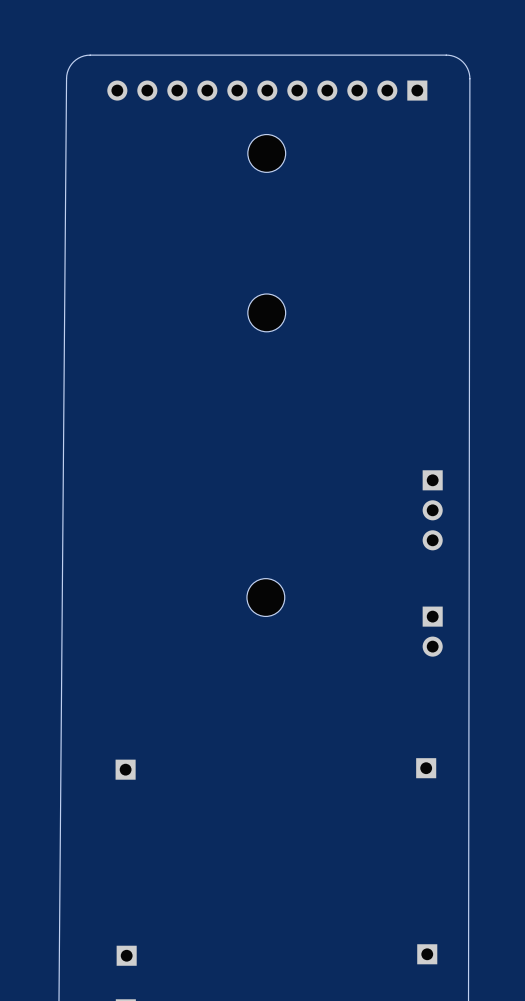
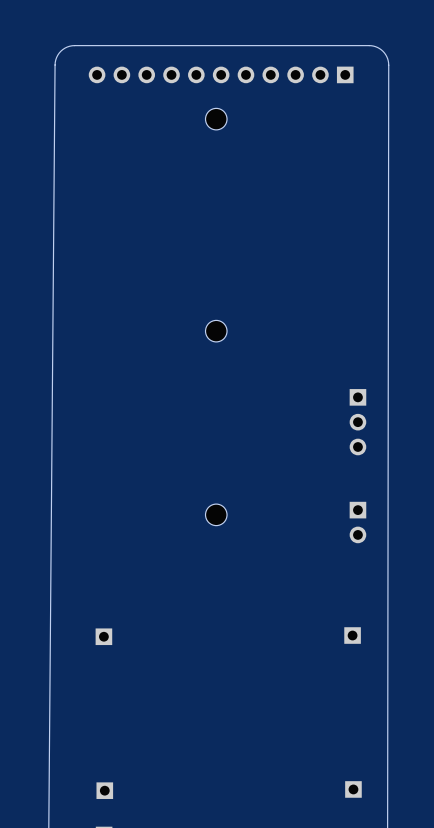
part footprint: [247, 134, 286, 173] -> [205, 108, 228, 130]
part: (266, 312) -> none
part: none -> (216, 331)
part: (265, 597) -> none
part: none -> (216, 514)

